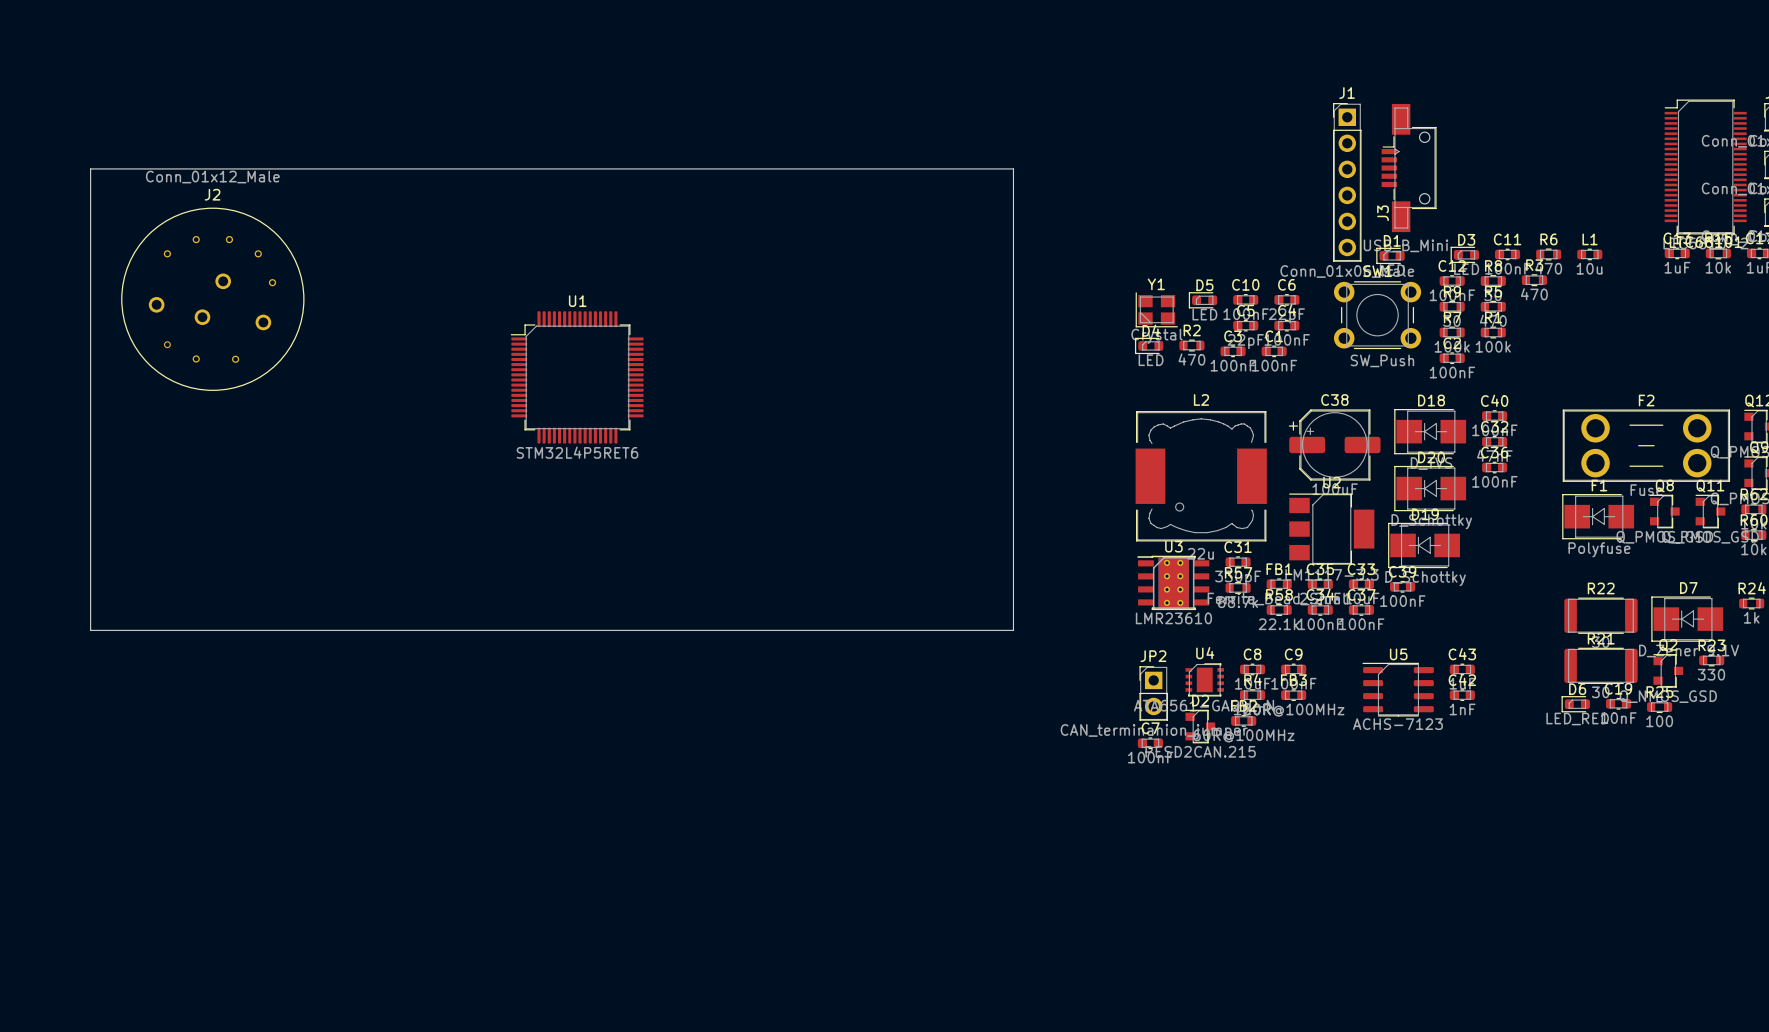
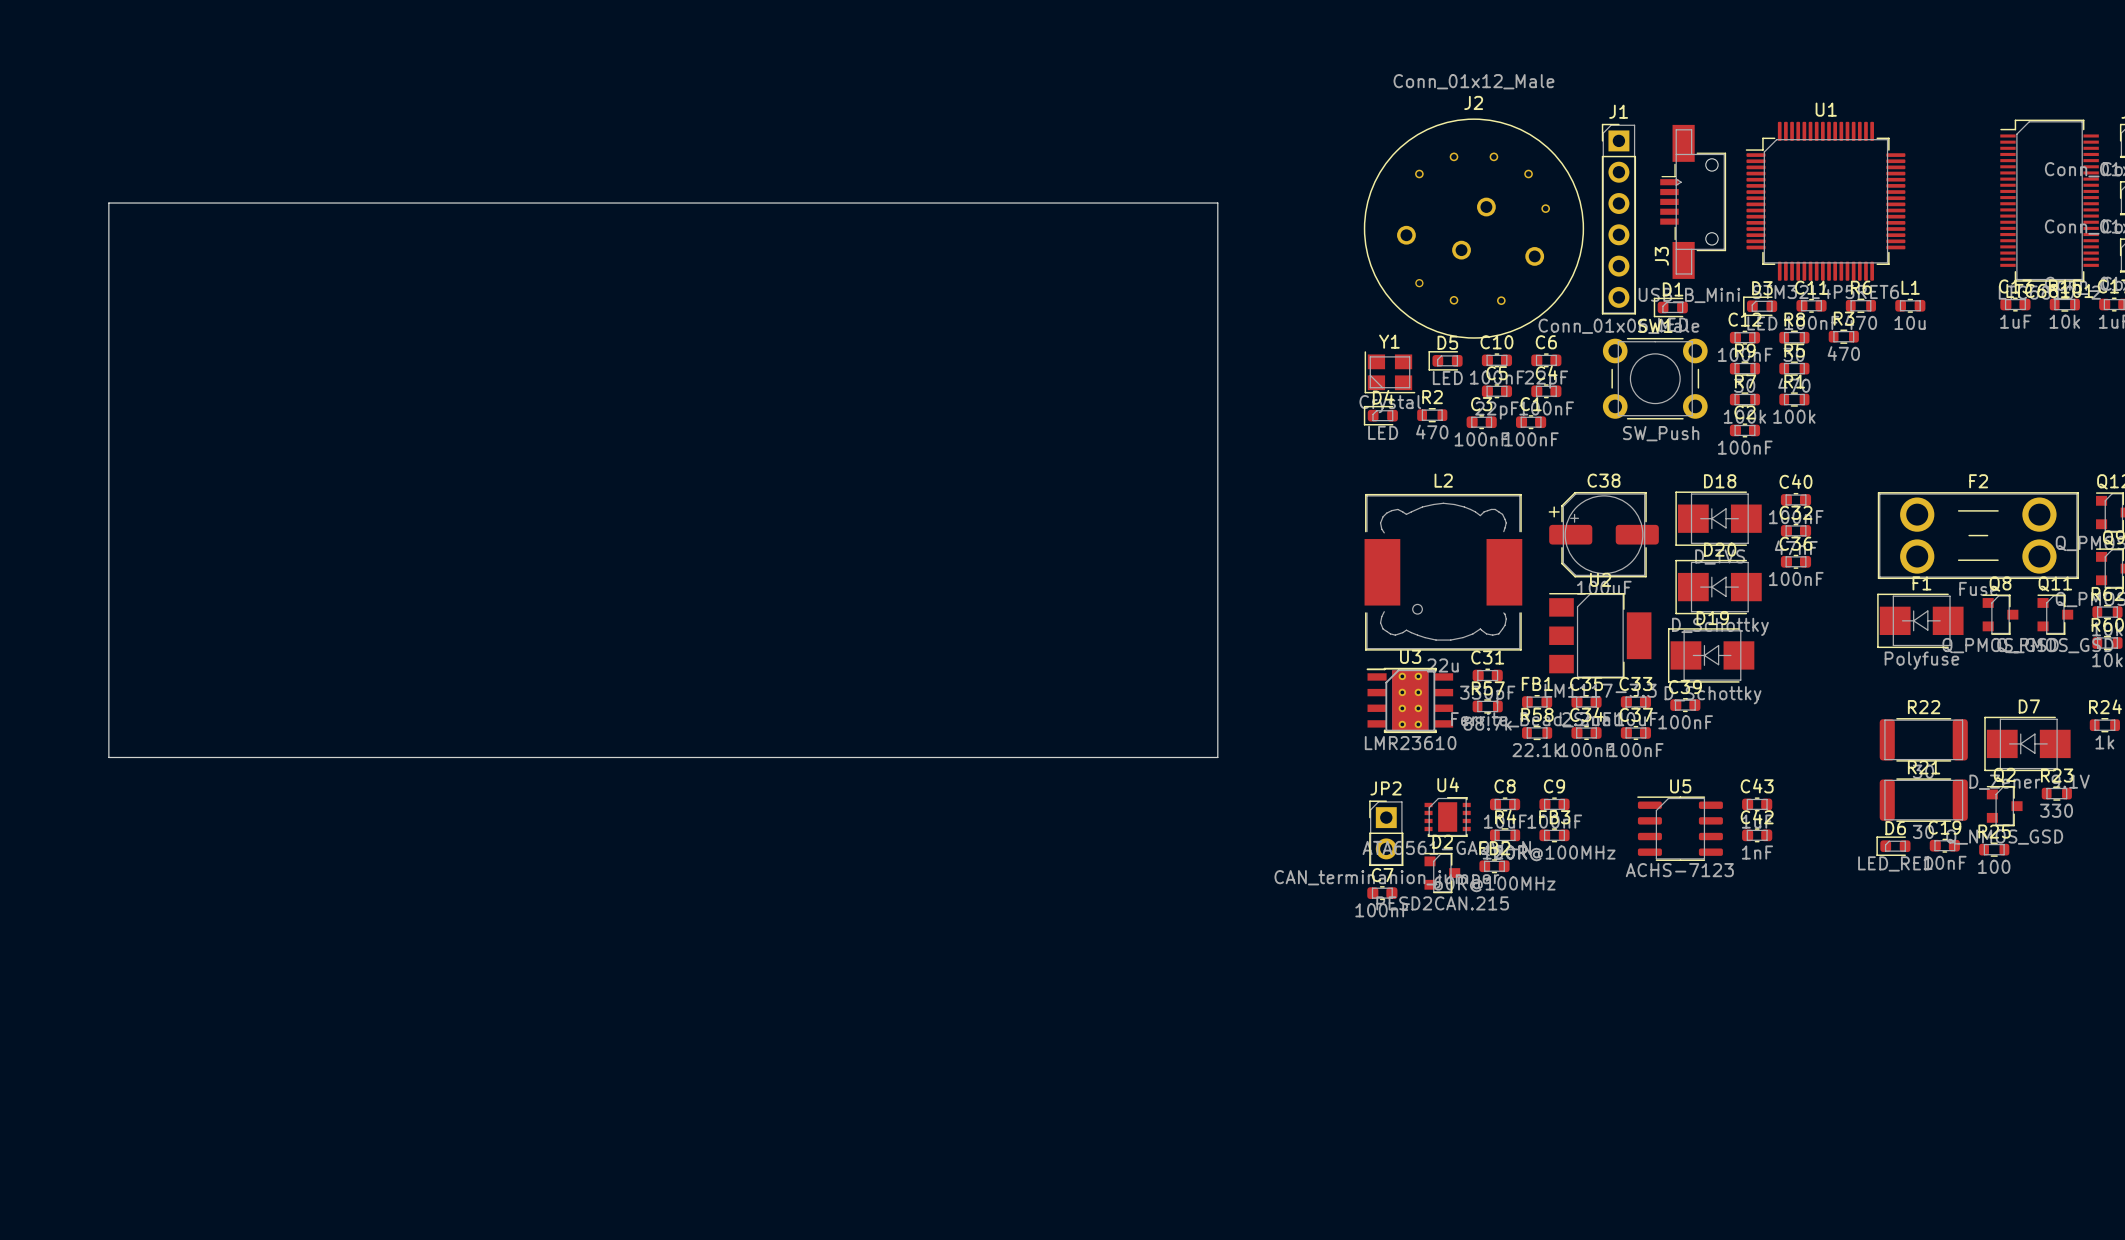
J2 position: (212, 299) -> (1473, 228)
U1 position: (577, 377) -> (1825, 201)

